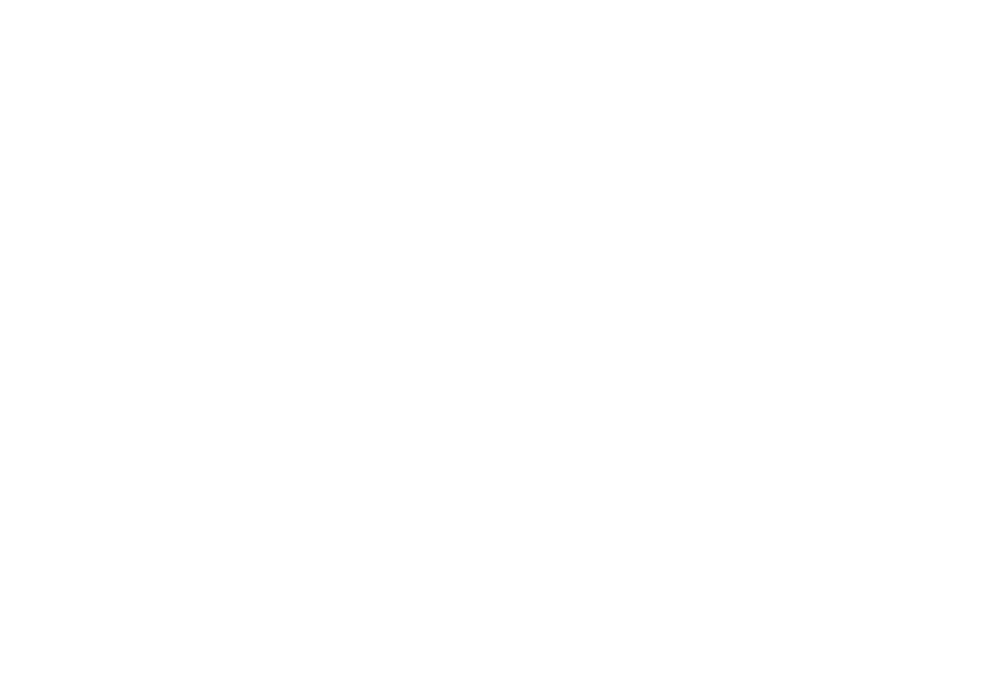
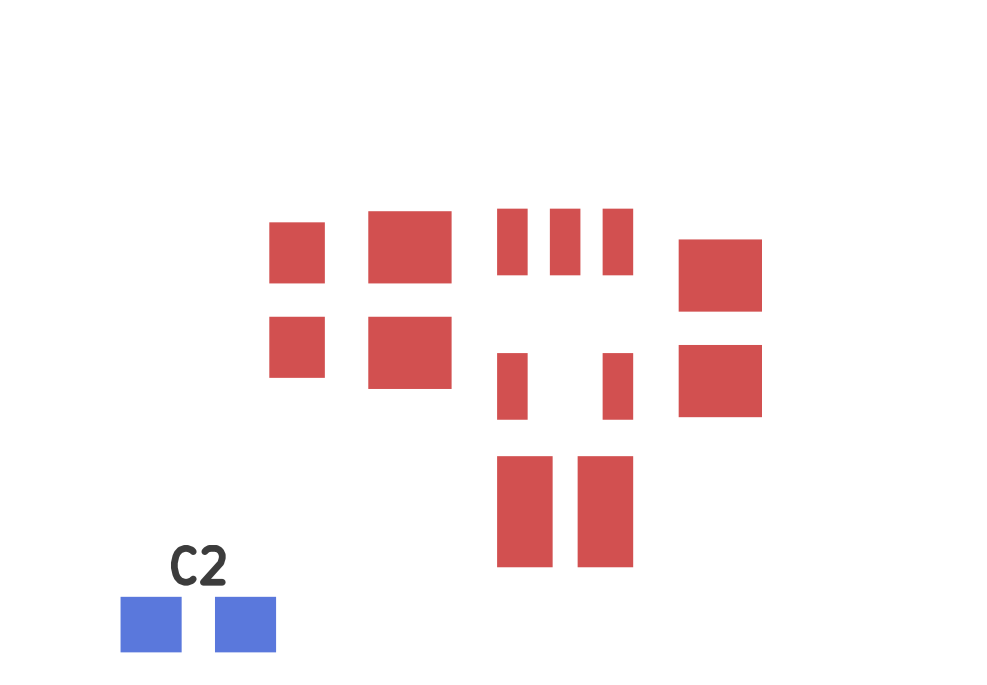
part: none -> (297, 300)
part: none -> (409, 300)
part: none -> (565, 314)
part: none -> (720, 328)
part: none -> (565, 511)
C2: none -> (198, 624)

